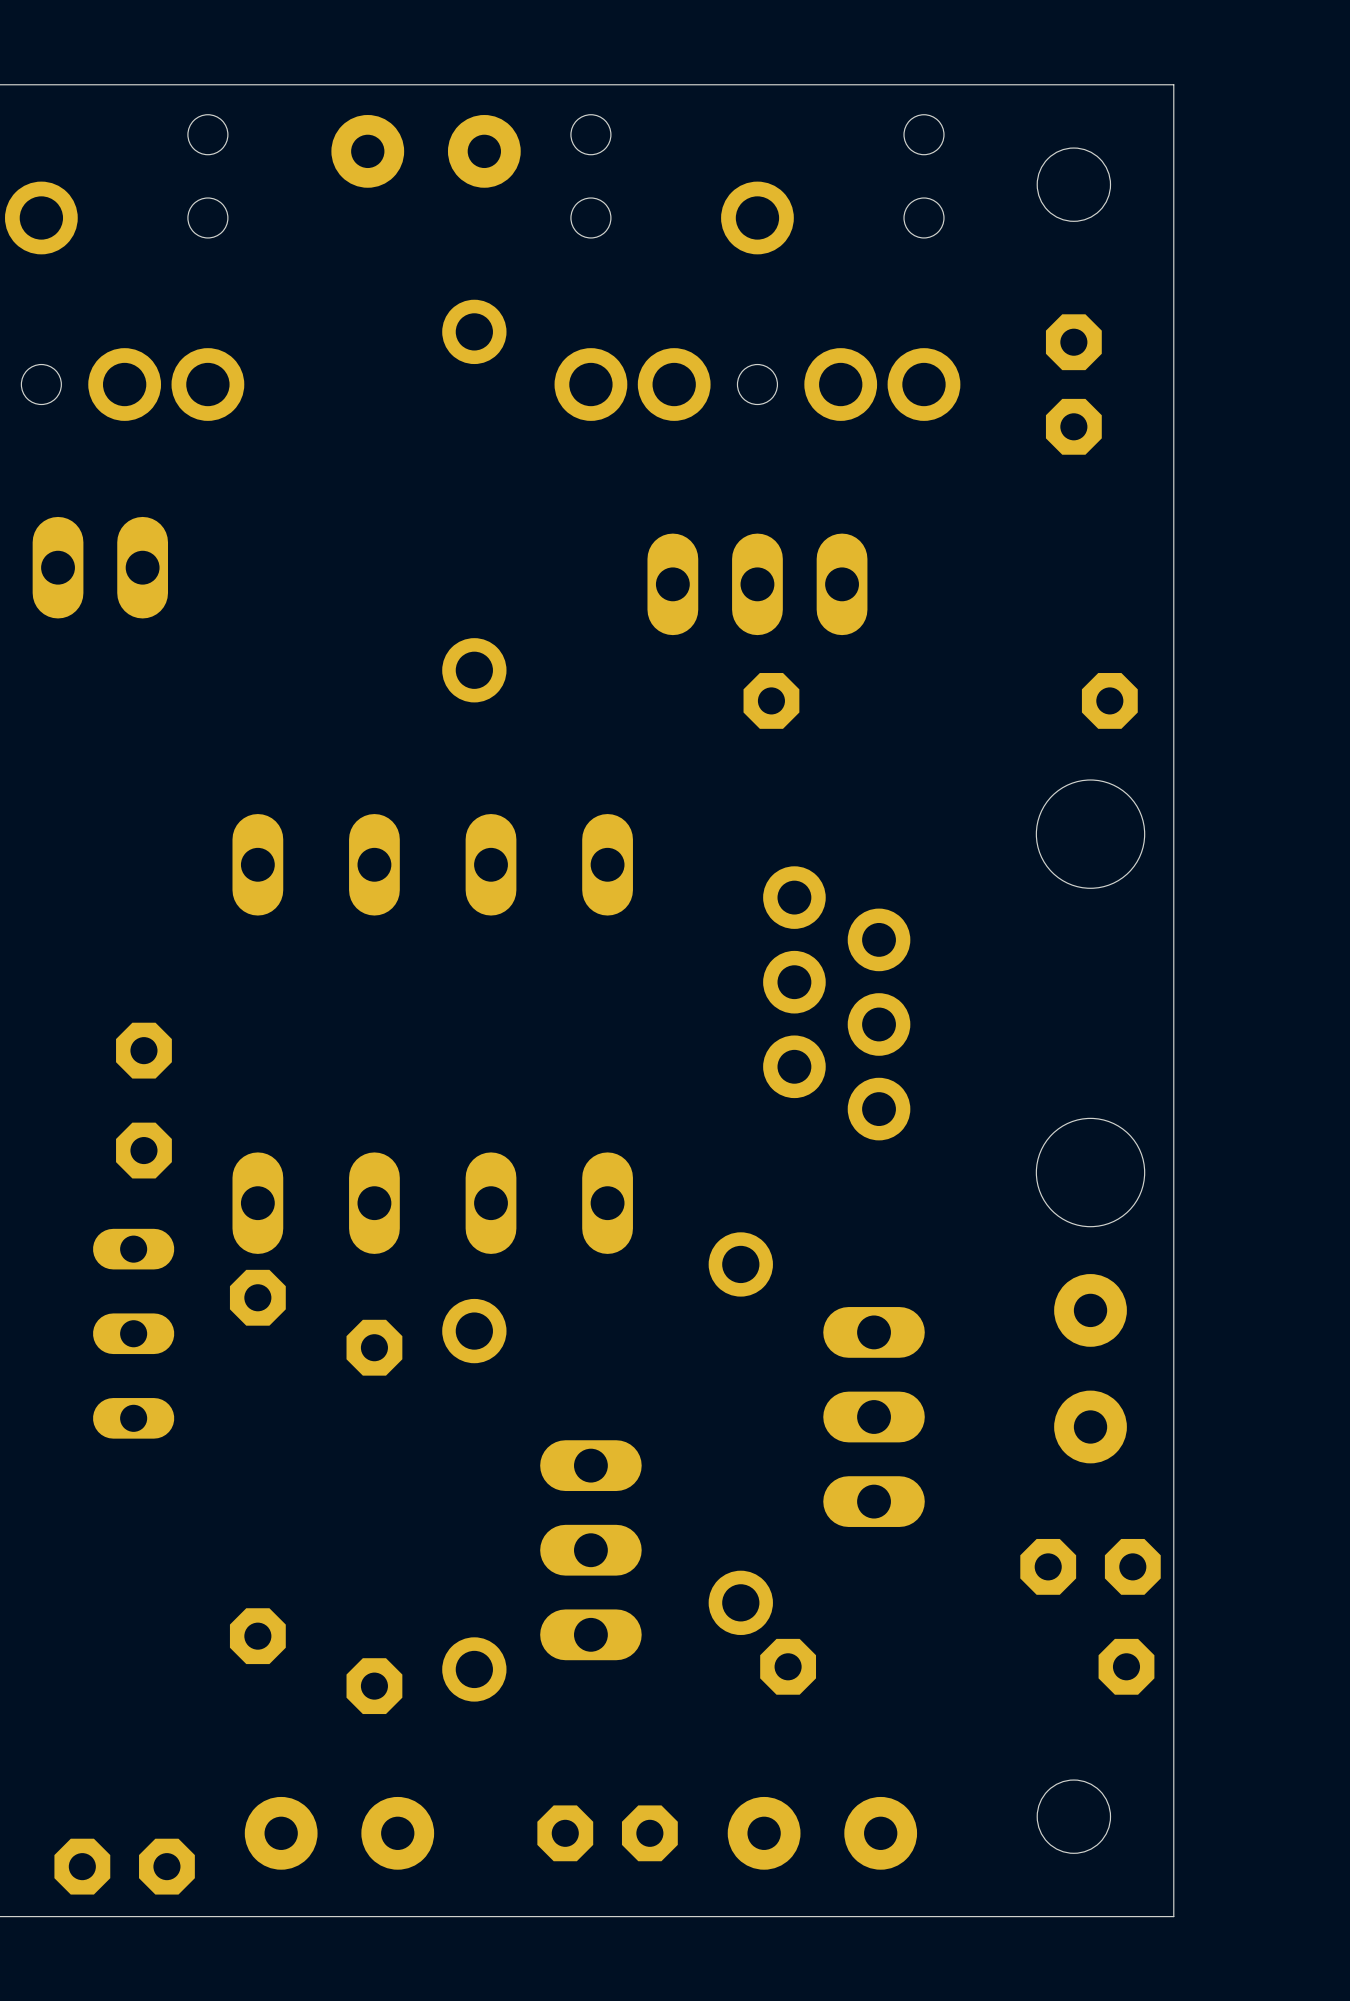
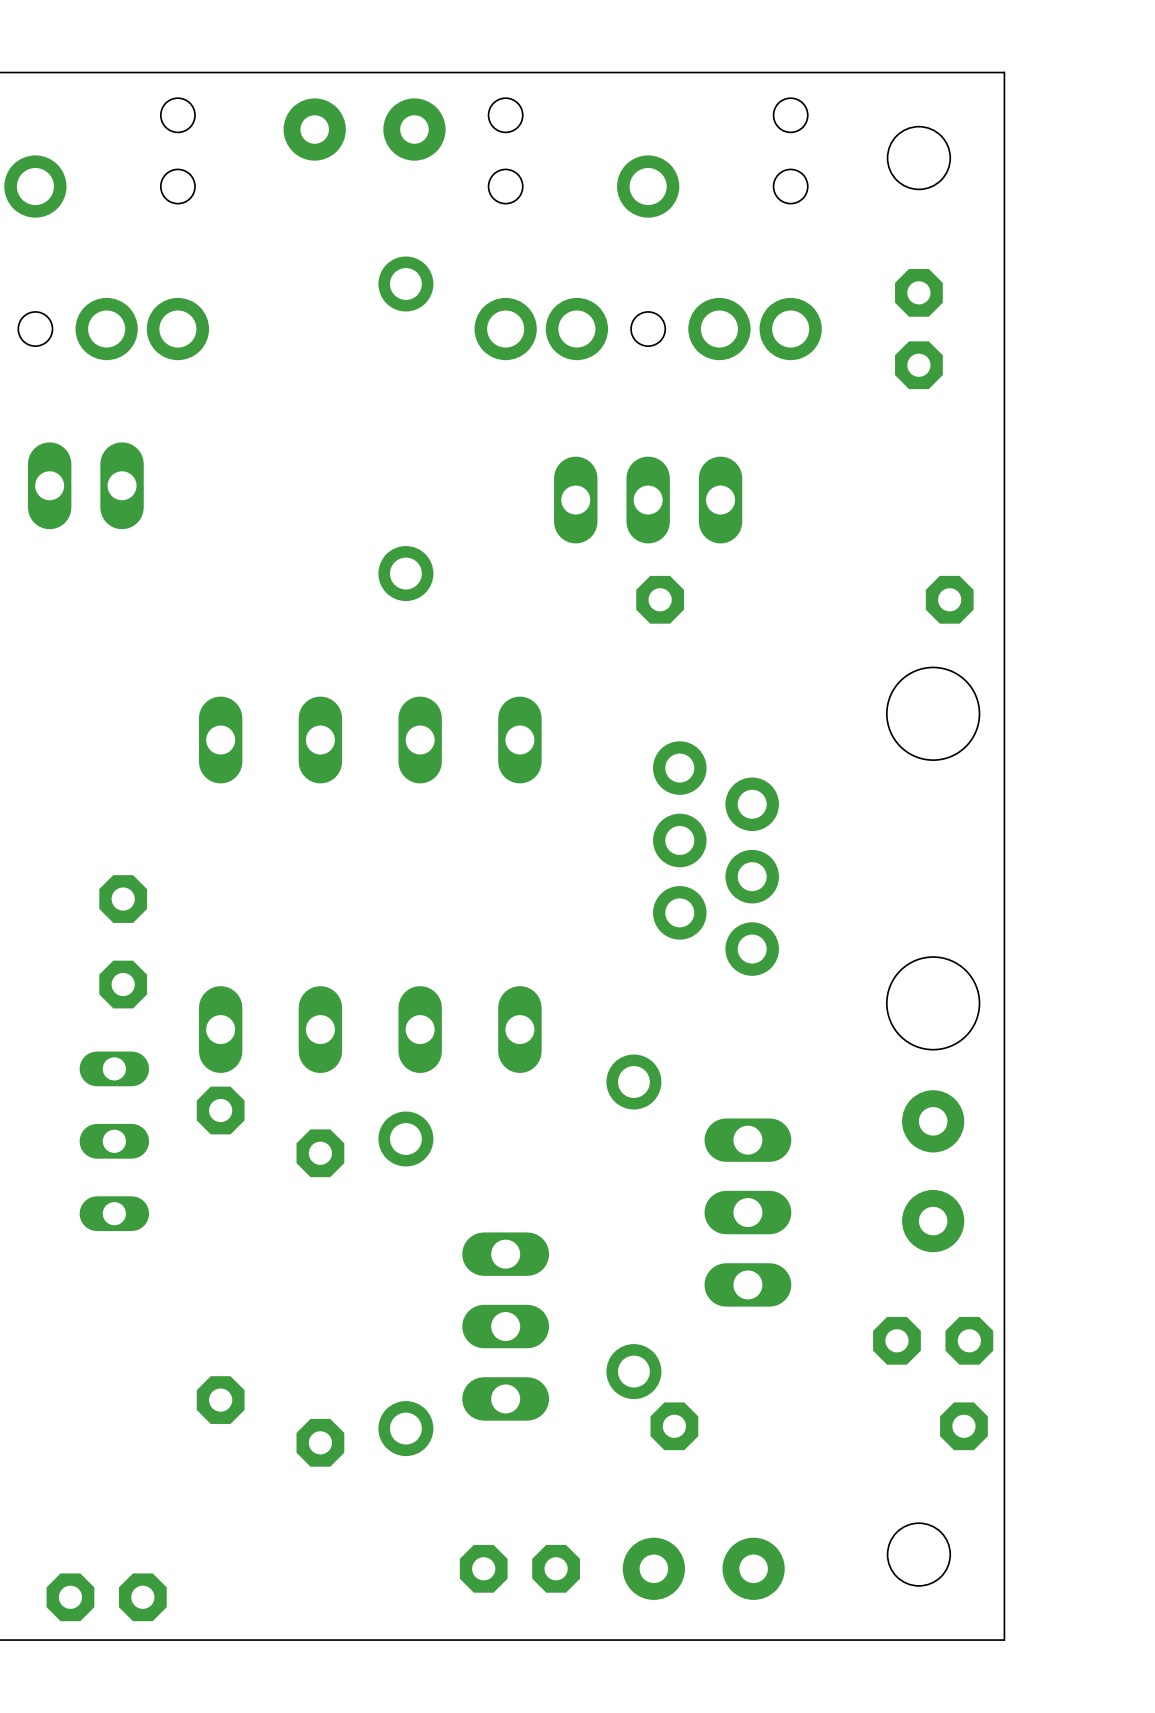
part: (339, 1833) -> none

